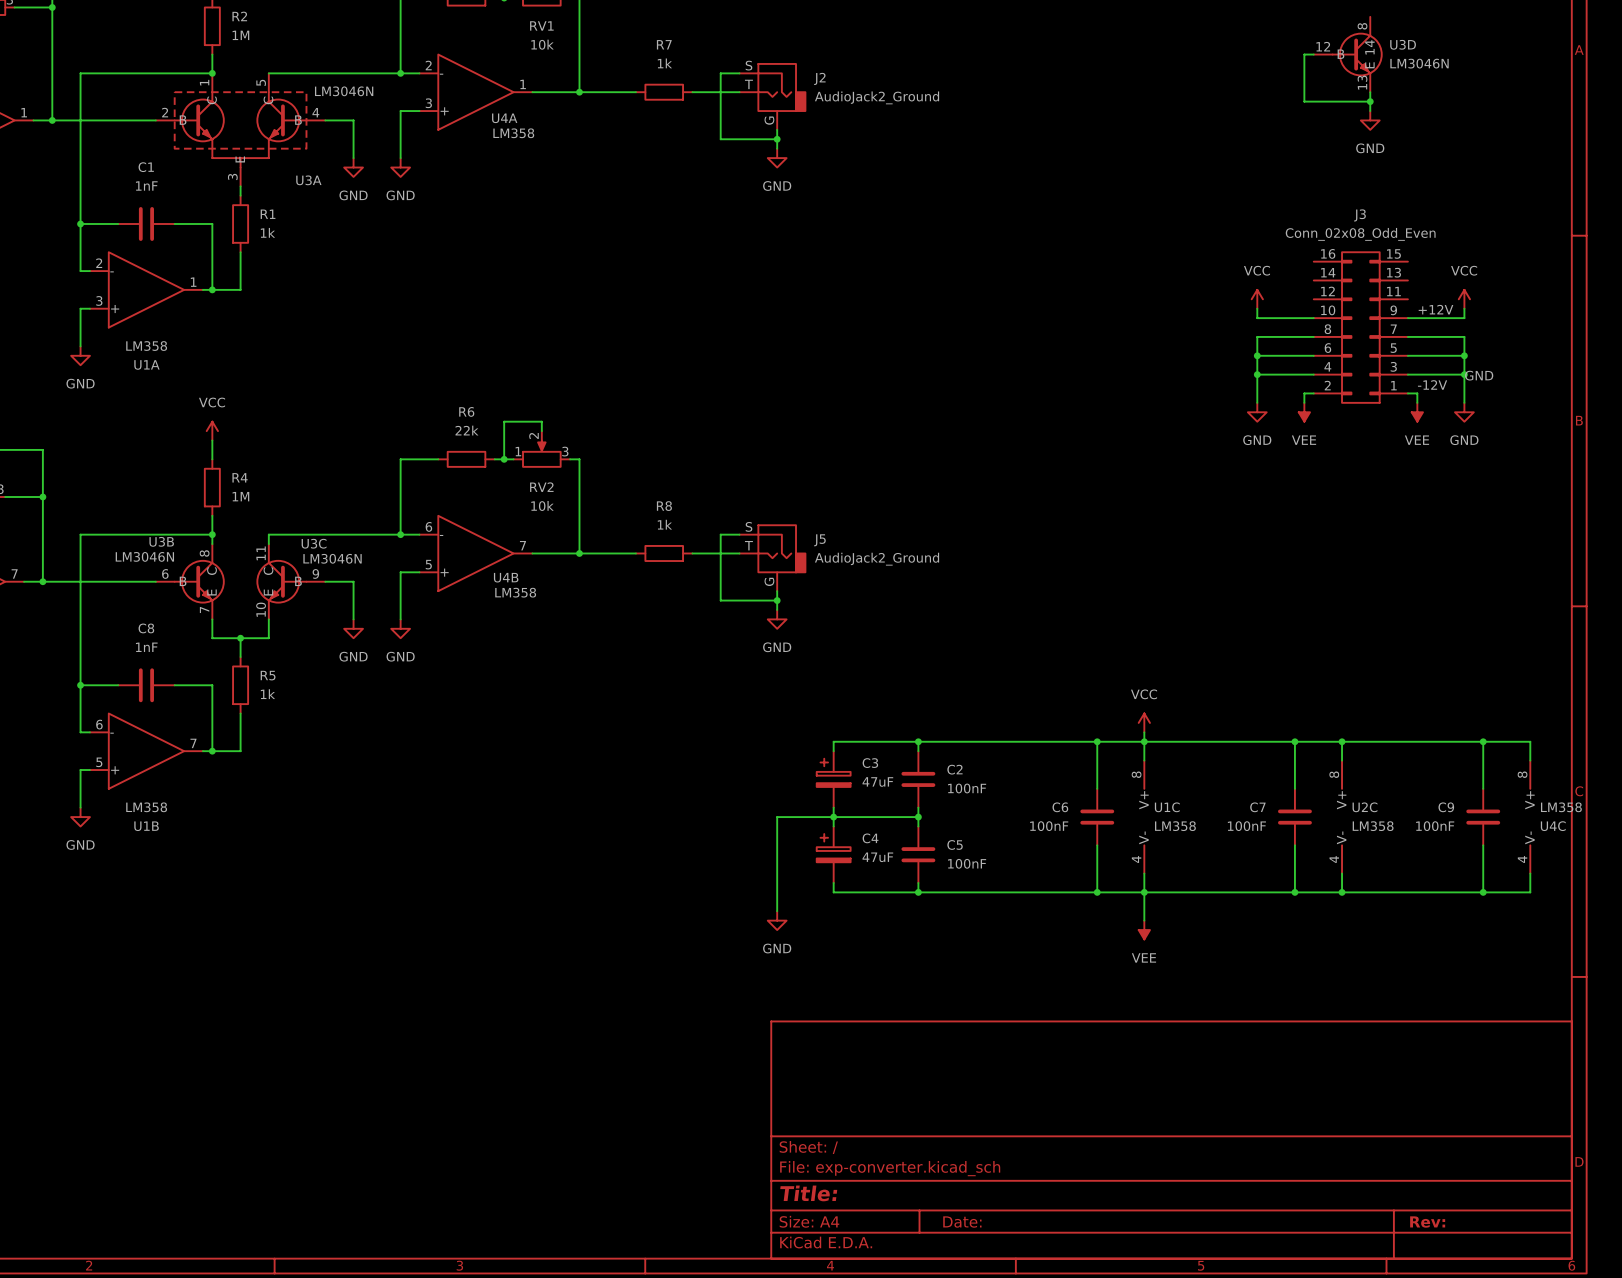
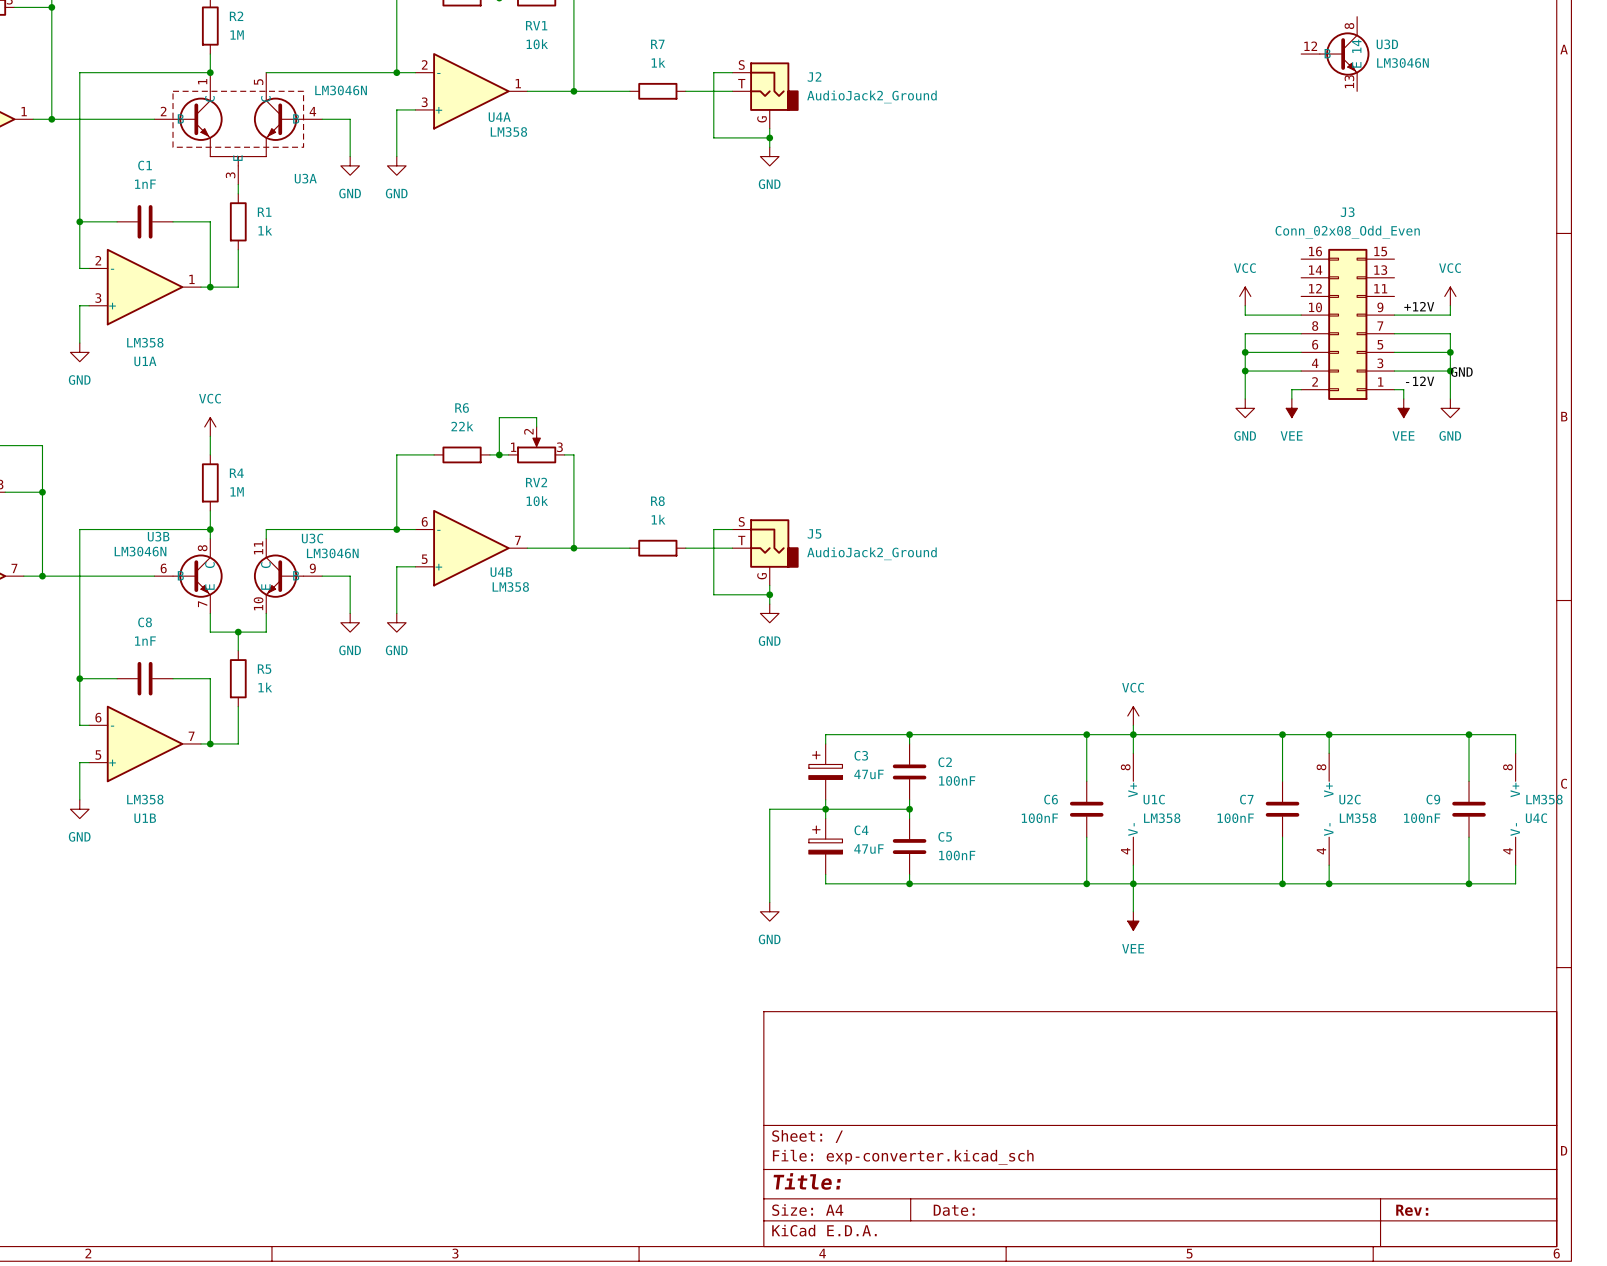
wire: (1313, 54) (1304, 54) (1304, 101) (1370, 101) -> none
wire: (1370, 92) (1370, 111) -> none
junction: (1370, 101) -> none
power symbol: GND (1370, 120) -> none

